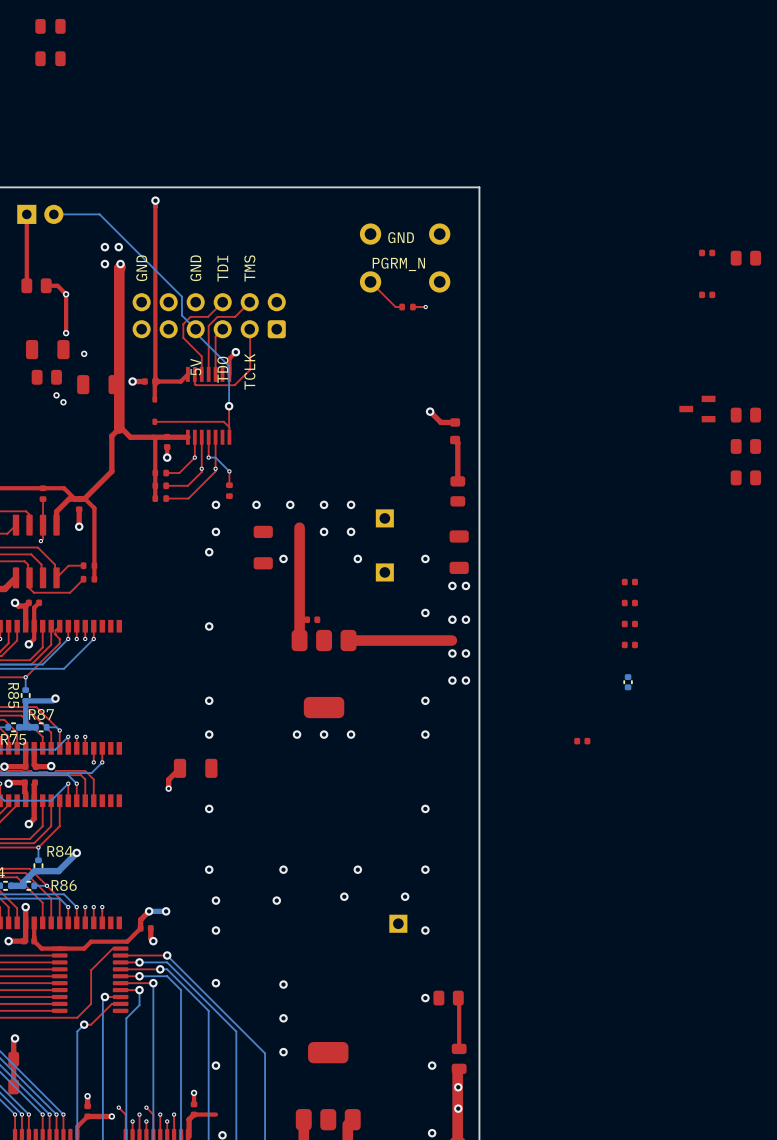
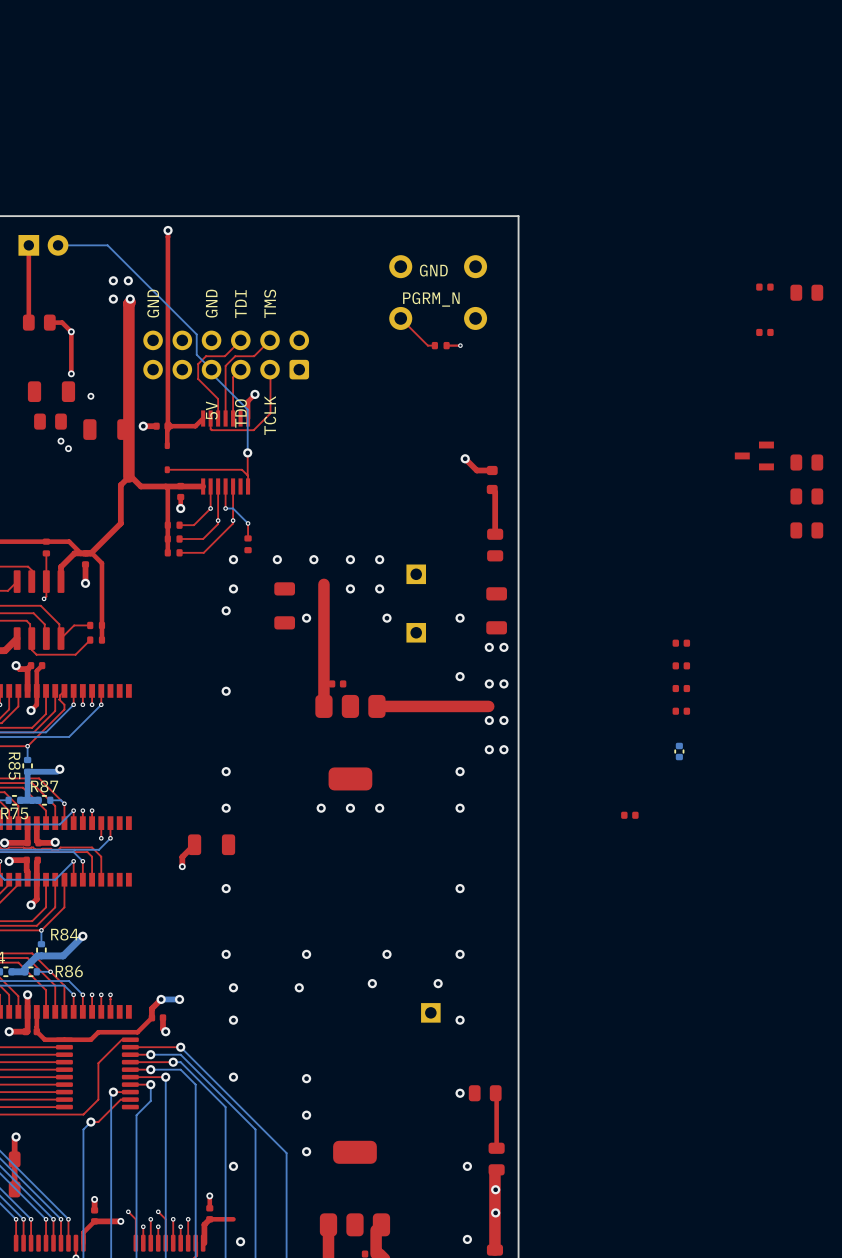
part: (50, 26) -> none
part: (50, 58) -> none

